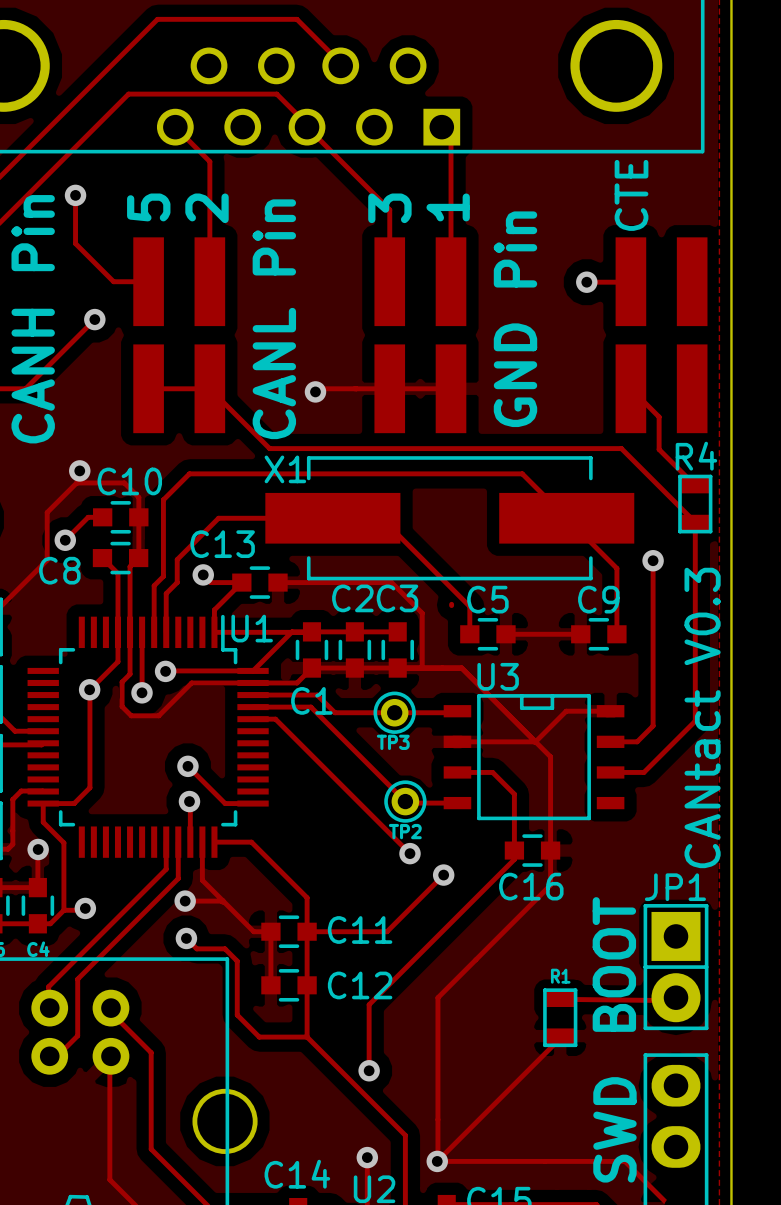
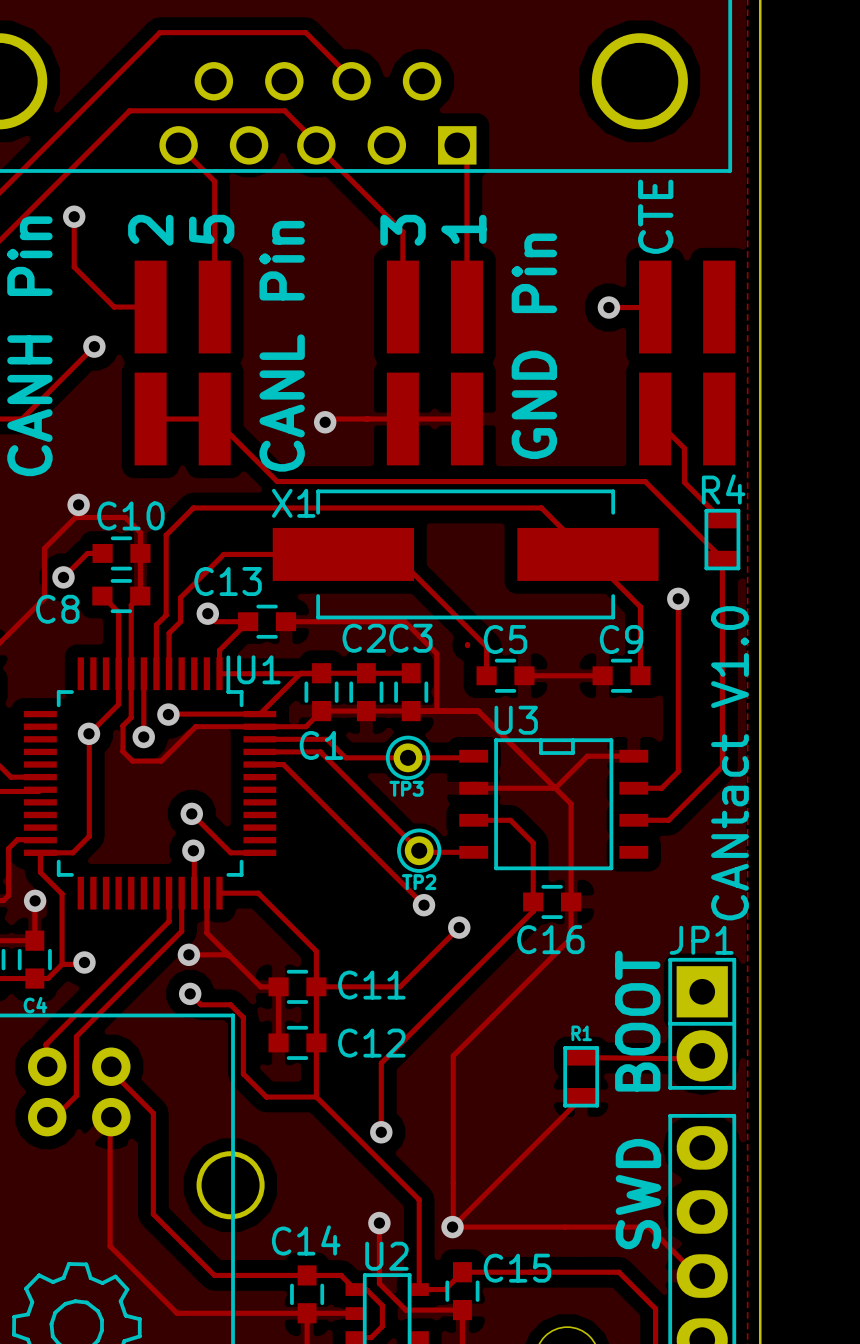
text: 5 (148, 207) -> 2 (150, 230)
text: 2 (207, 208) -> 5 (211, 229)
text: CANtact V0.3 (702, 717) -> CANtact V1.0 (730, 763)

